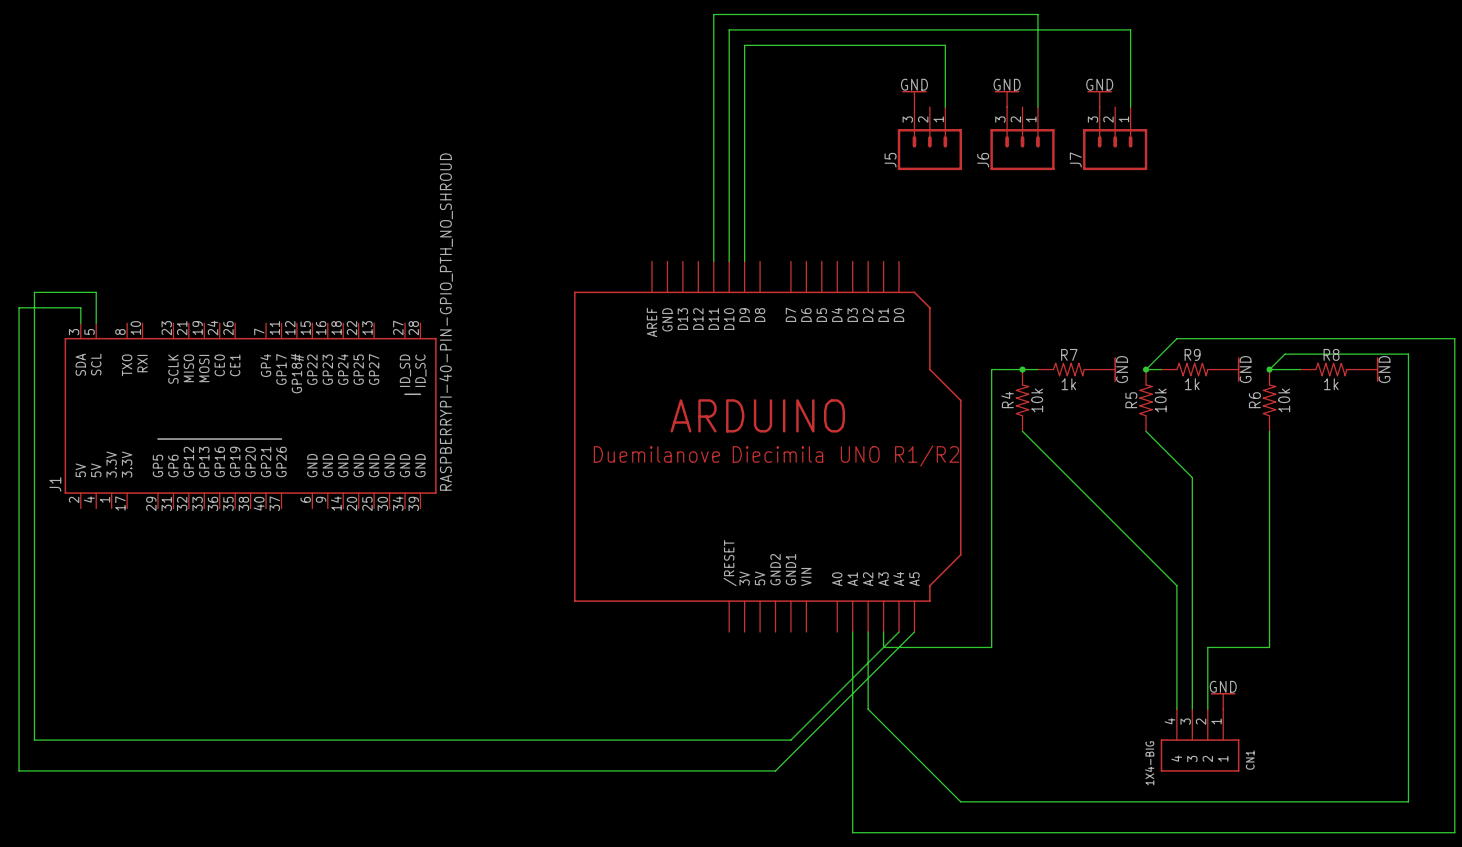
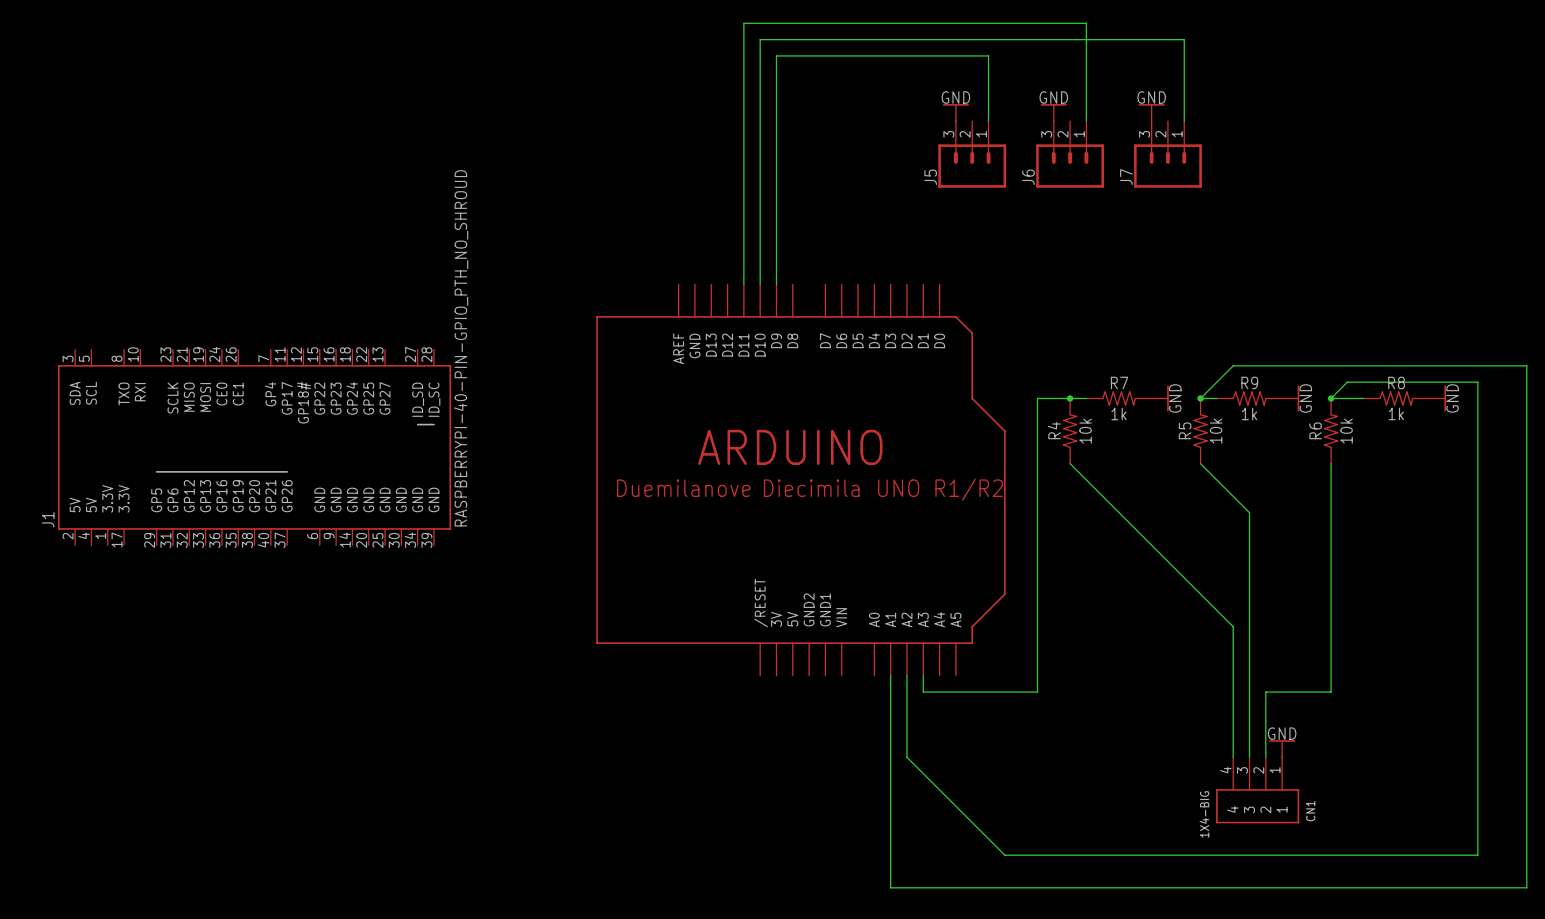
wire: (80, 323) (80, 307) (19, 307) (19, 770) (775, 770) (914, 632) -> none
wire: (96, 323) (96, 292) (34, 292) (34, 740) (790, 740) (899, 632) -> none

